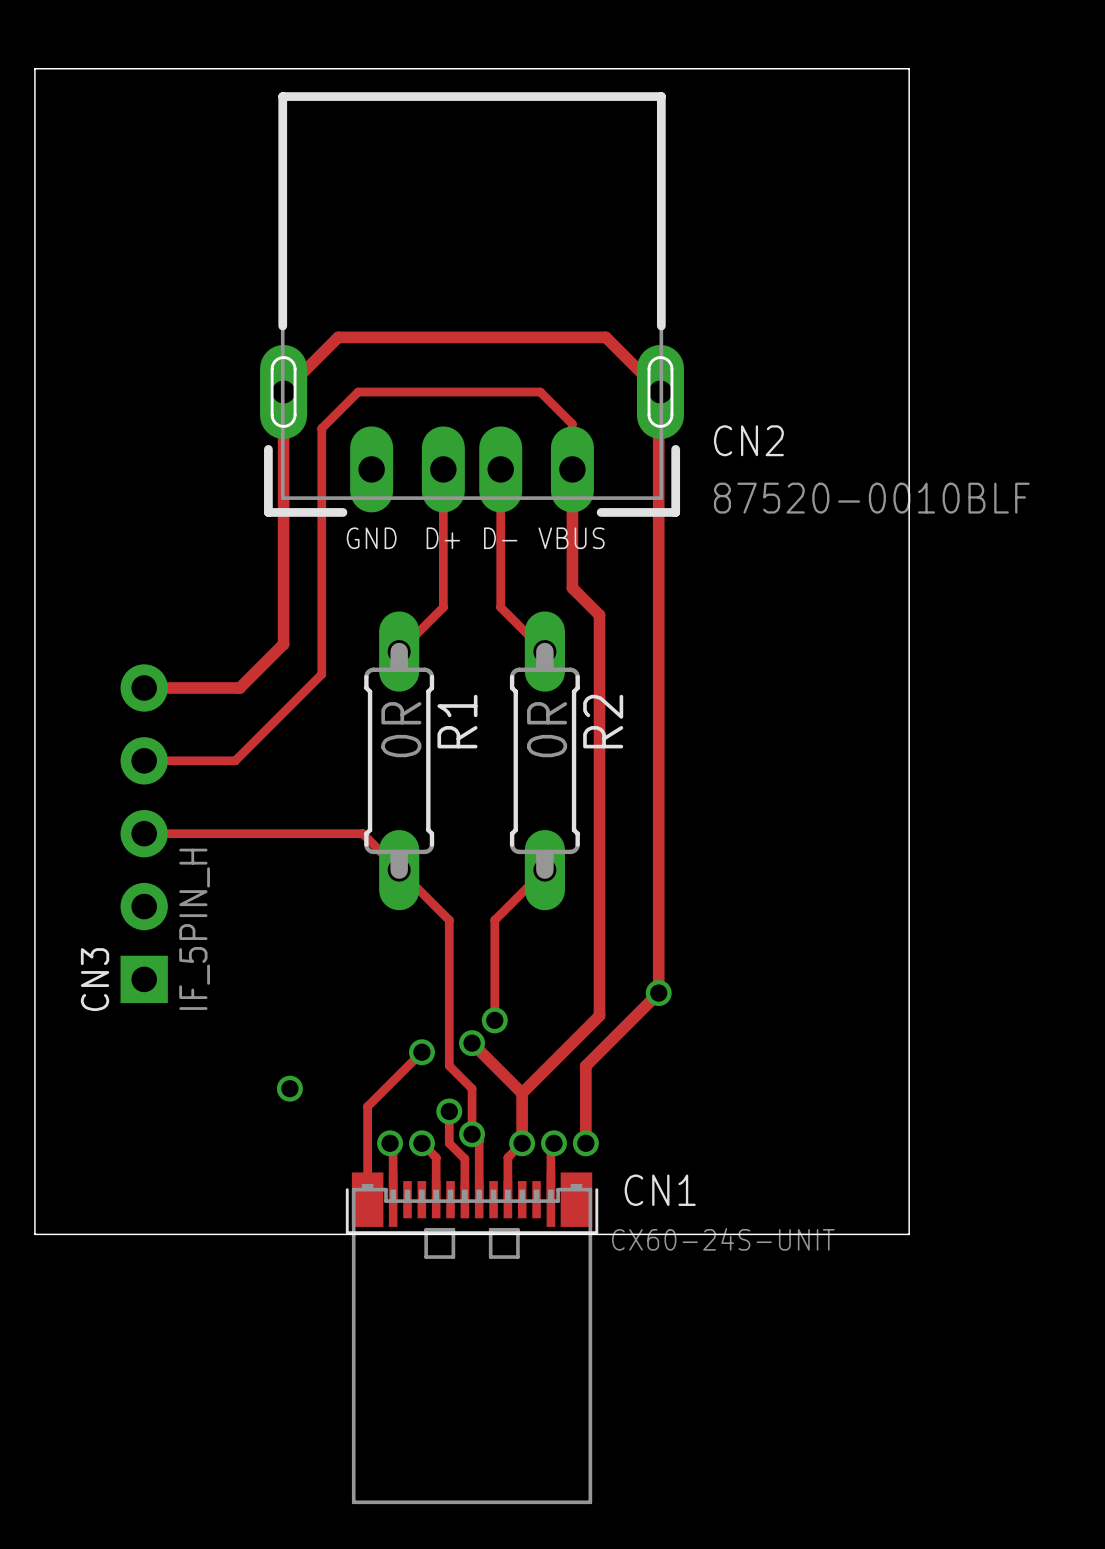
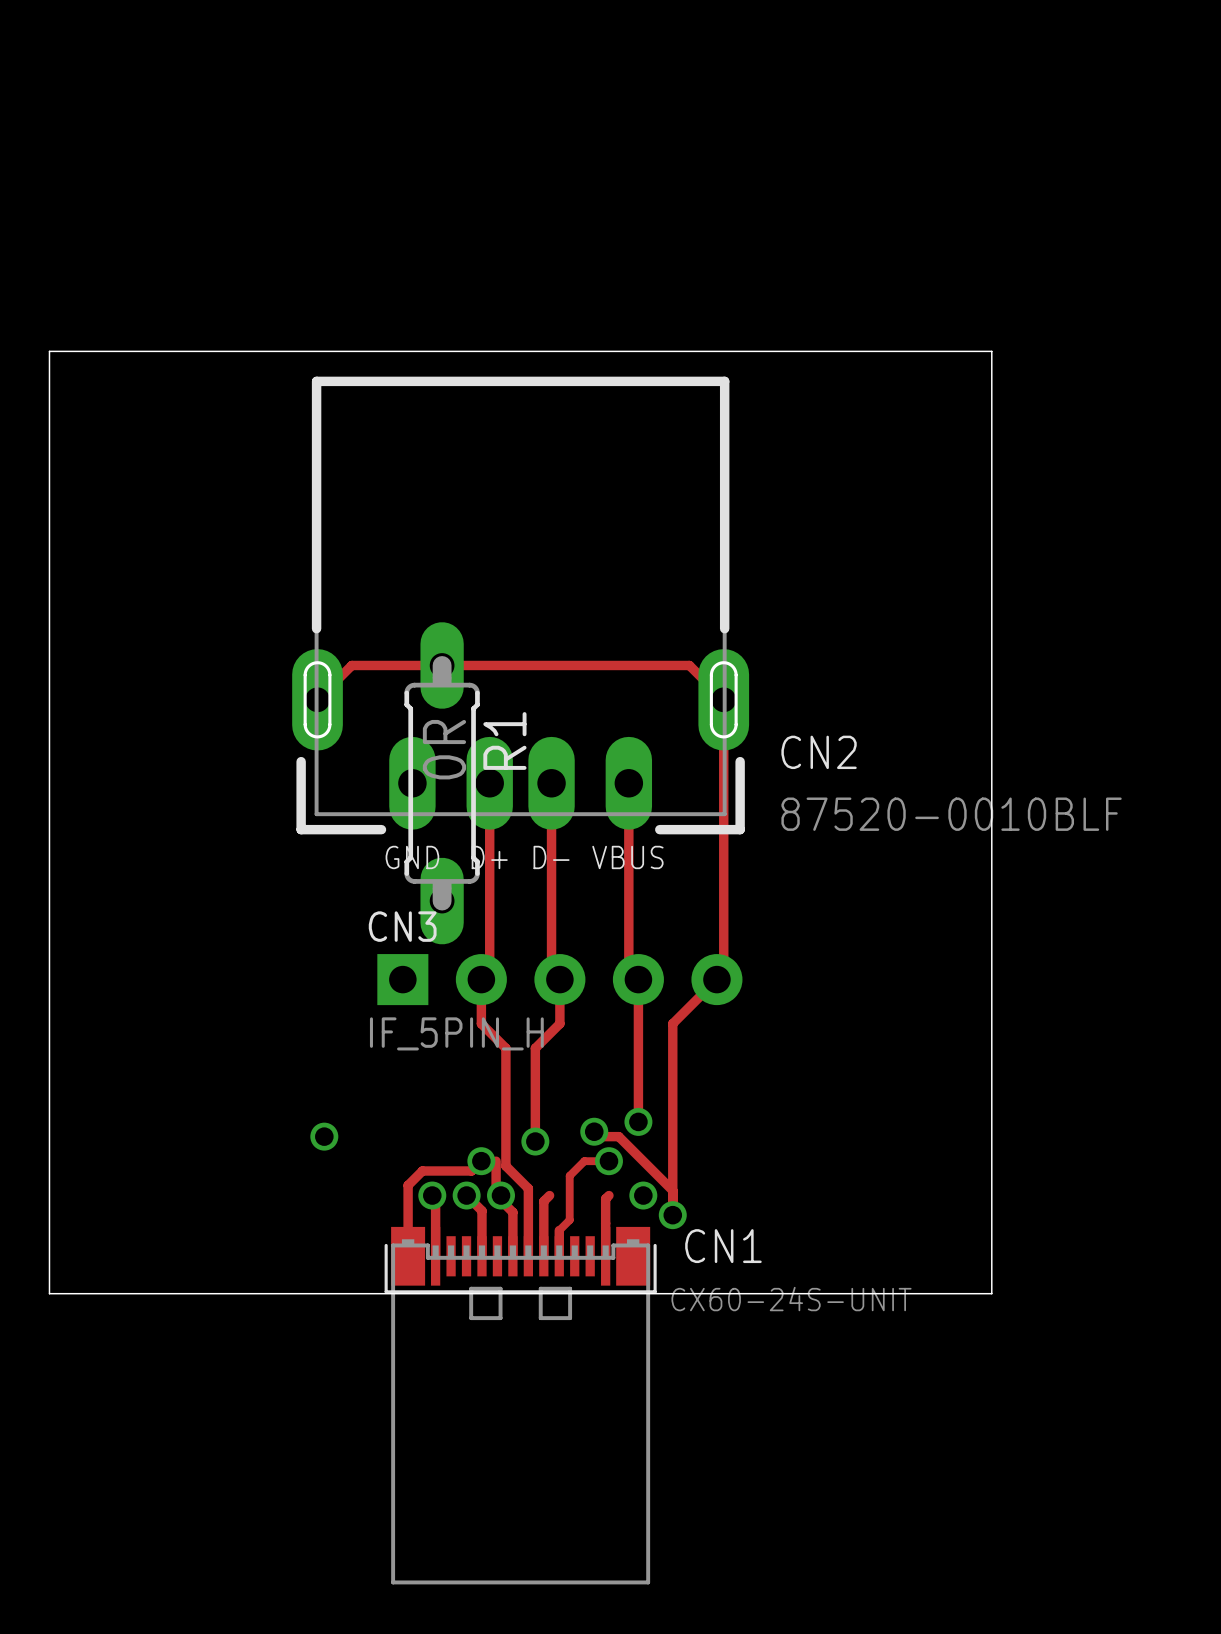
CN2 position: (472, 304) -> (520, 605)
board edge: (34, 360) (34, 68) (909, 68) (909, 360) -> (49, 351) (991, 351)
track: (443, 469) (443, 607) (399, 651) -> none
track: (500, 469) (500, 607) (544, 651) -> none
track: (572, 469) (572, 588) (599, 615) (599, 1015) (522, 1093) -> none
track: (572, 487) (572, 423) (540, 392) (358, 392) (321, 428) (321, 674) (235, 760) (144, 760) -> none
track: none -> (317, 699) (351, 665) (689, 665) (723, 699) (723, 972) (672, 1023) (672, 1215)
track: (144, 687) (239, 687) (283, 644) (283, 391) (338, 337) (605, 337) (660, 391) (658, 393) (658, 993) (585, 1065) (585, 1143) -> none
track: none -> (551, 783) (551, 971) (559, 979) (559, 1023) (535, 1048) (535, 1141)
R2: 0R (544, 760) -> none
track: none -> (628, 783) (628, 970) (638, 979) (638, 1121)
track: (144, 833) (362, 833) (449, 920) (449, 1065) (472, 1088) (472, 1134) (479, 1141) -> (489, 783) (489, 971) (481, 979) (481, 1023) (505, 1048) (505, 1166) (528, 1188) (528, 1193)
CN3 rotation: 0° (144, 833) -> 90° clockwise (559, 979)
CN3 position: (144, 833) -> (559, 979)
track: (544, 870) (494, 920) (494, 1020) -> none
via: (658, 993) -> none
via: (494, 1020) -> none
track: (472, 1043) (522, 1093) -> none
via: (472, 1043) -> none
track: (421, 1052) (367, 1106) (367, 1133) -> (481, 1161) (471, 1170) (422, 1170) (408, 1185)
via: (421, 1052) -> none
via: none -> (638, 1121)
track: none -> (594, 1131) (599, 1136) (618, 1136) (672, 1190)
via: none -> (594, 1131)
via: none -> (535, 1141)
track: (522, 1093) (522, 1143) (507, 1157) (507, 1175) -> (608, 1161) (584, 1161) (569, 1175) (569, 1220) (559, 1230)
via position: (449, 1111) -> (481, 1161)
via: none -> (608, 1161)
via position: (472, 1134) -> (501, 1195)
track: none -> (549, 1195) (543, 1201) (543, 1256)
via: (522, 1143) -> none
via: (554, 1143) -> none
via: none -> (672, 1215)

